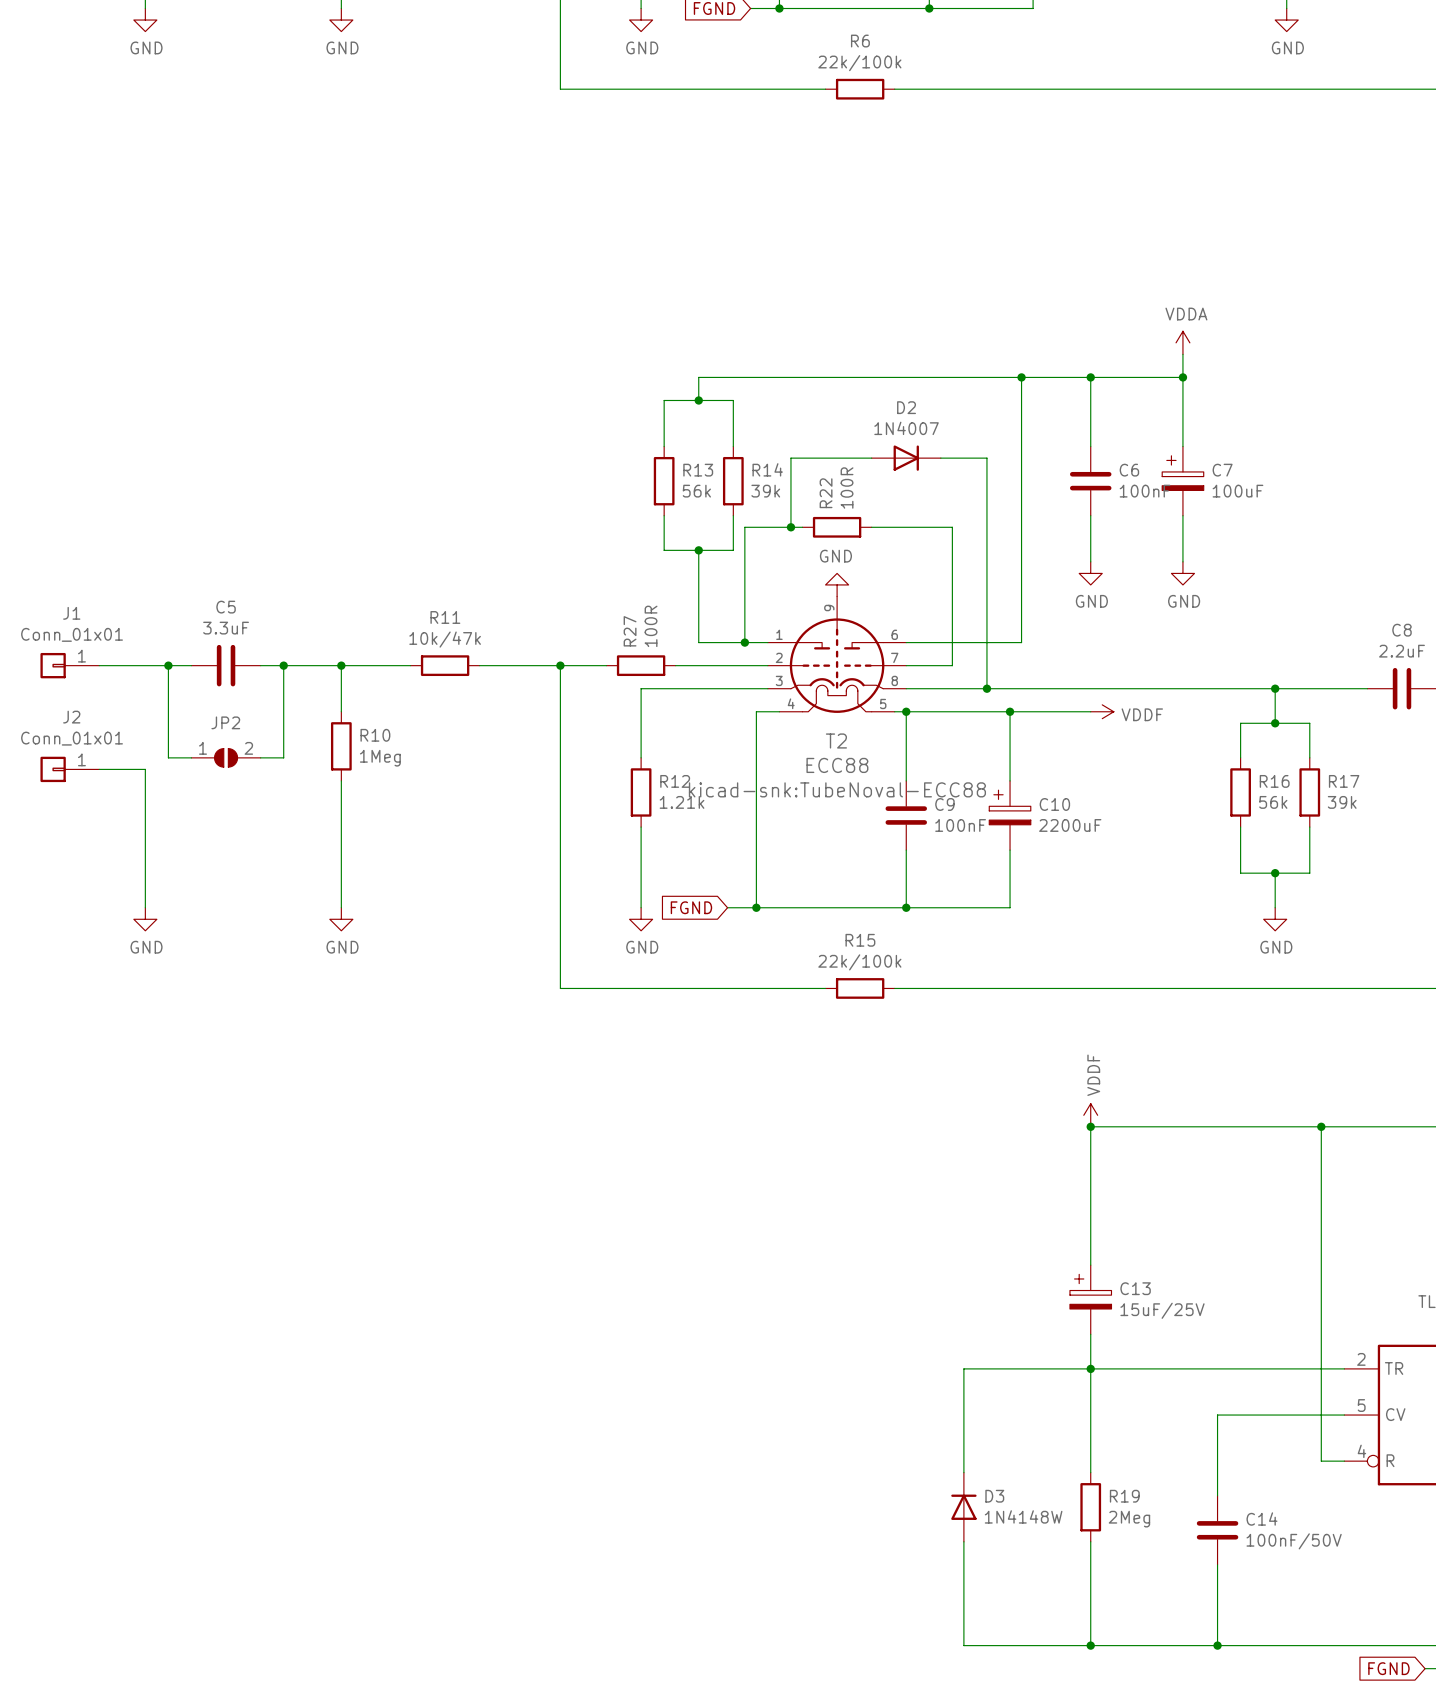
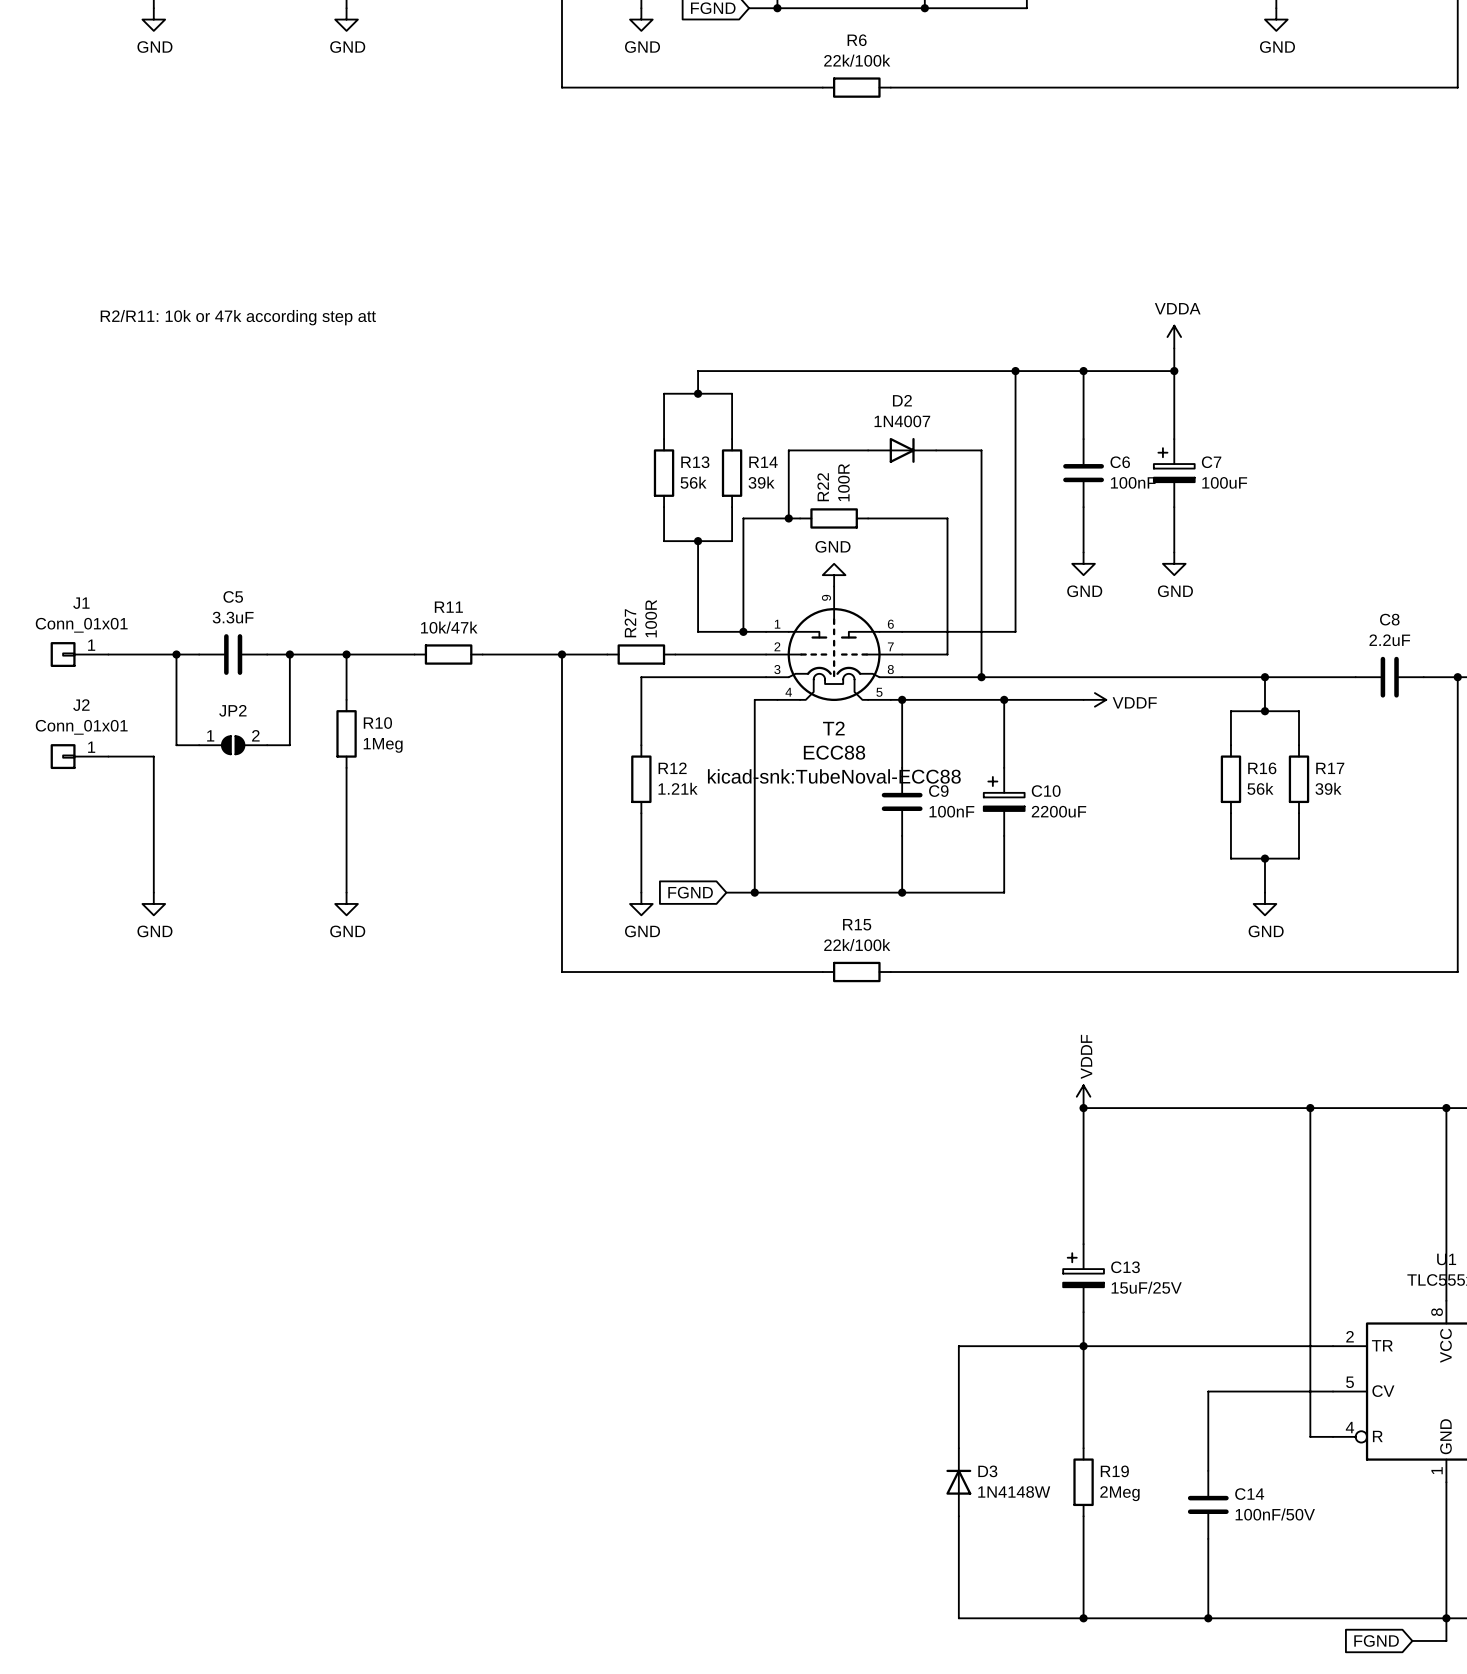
text: none -> R2/R11: 10k or 47k according step att (238, 317)

